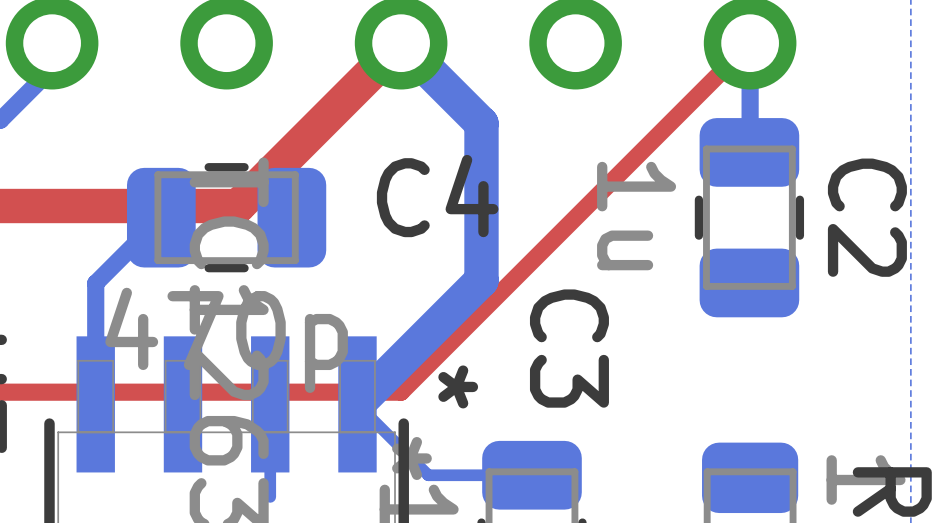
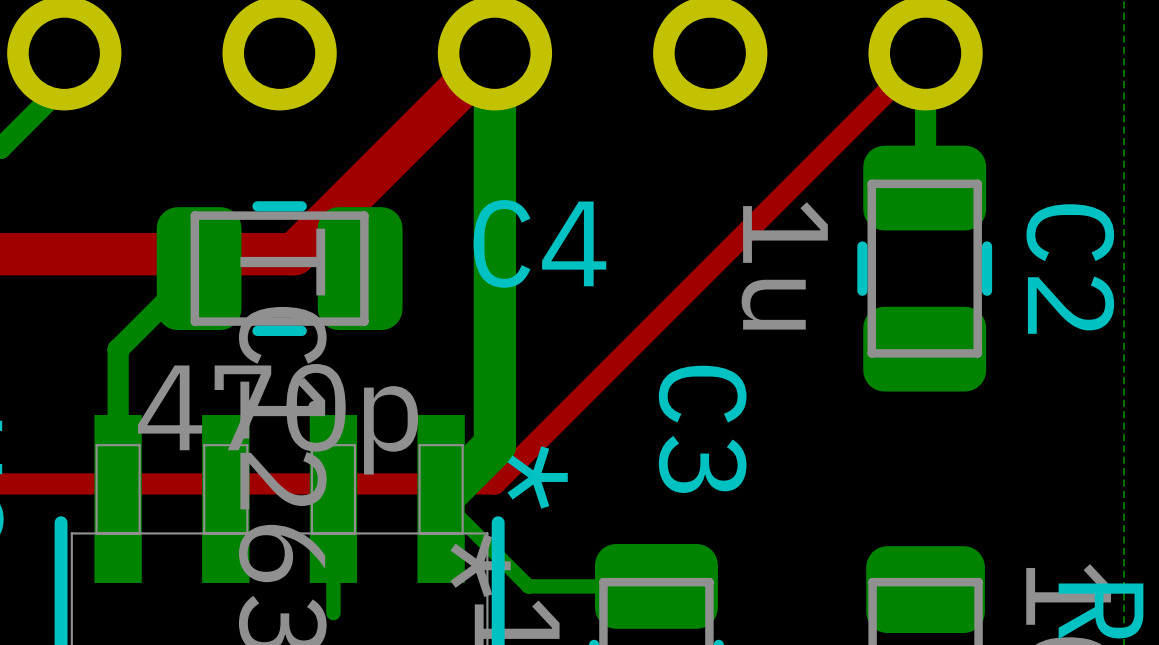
bottom track: (401, 43) (481, 123) (481, 280) (401, 360) -> (494, 53) (494, 445)

